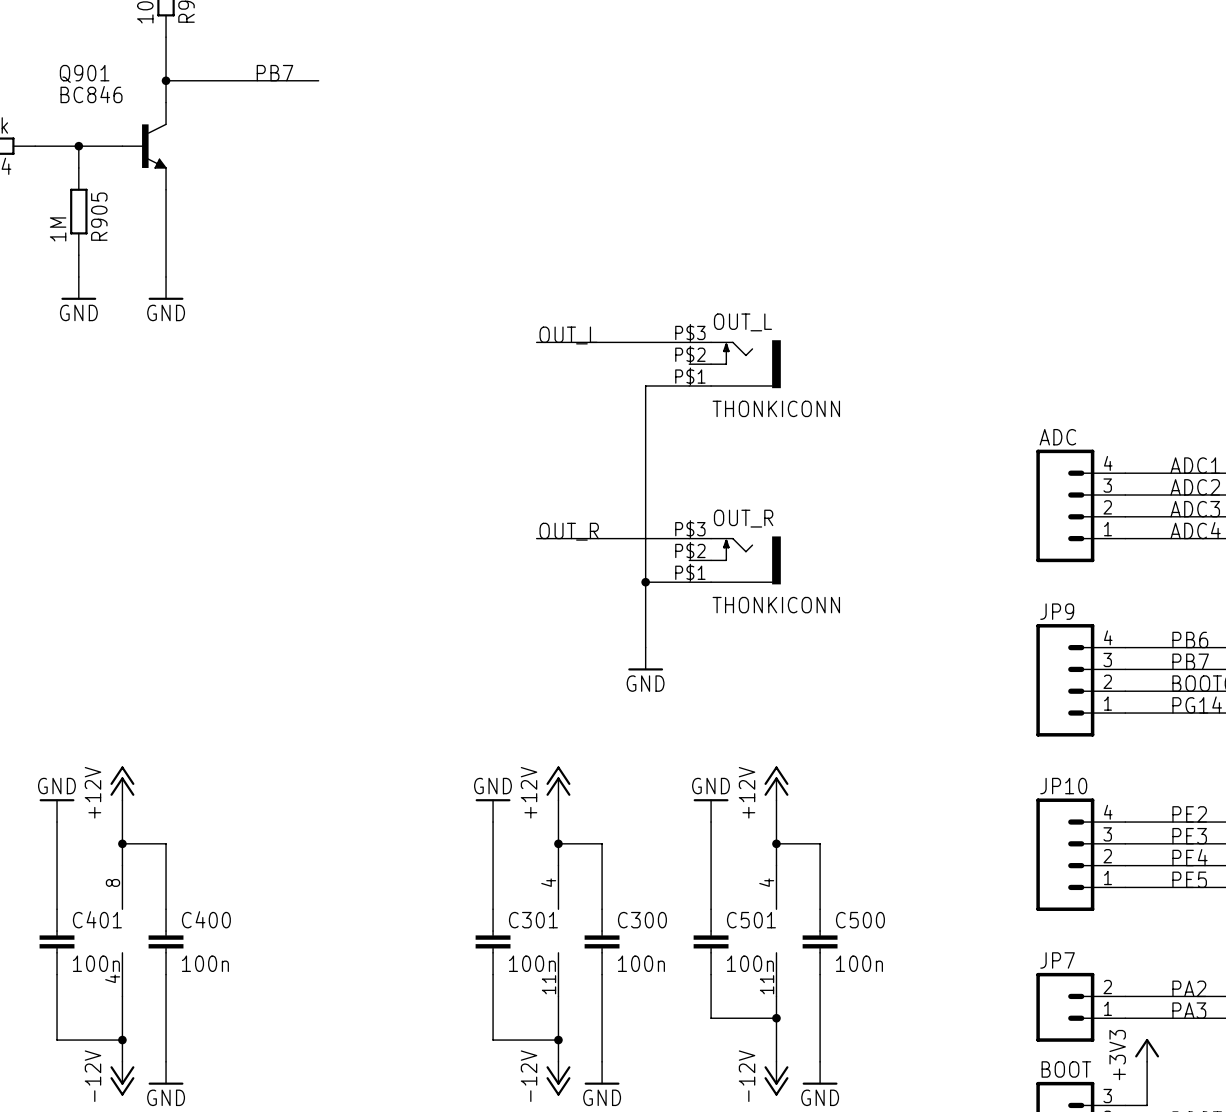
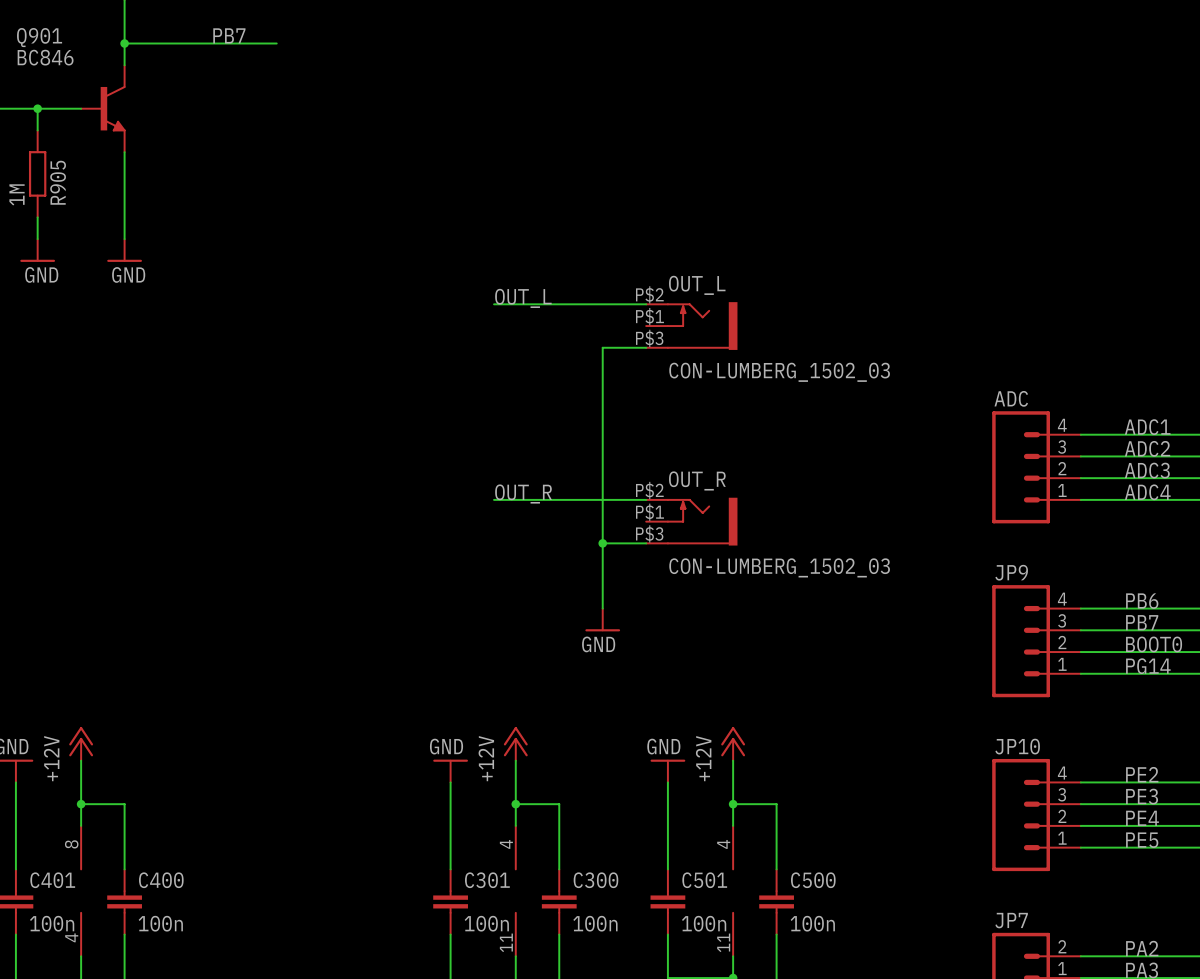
OUT_L pin number: P$3 (690, 332) -> P$2 (649, 294)
OUT_L pin number: P$2 (690, 354) -> P$1 (649, 316)
OUT_L pin number: P$1 (690, 376) -> P$3 (649, 338)
OUT_L value: THONKICONN (776, 408) -> CON-LUMBERG_1502_03 (779, 372)
OUT_R pin number: P$3 (690, 529) -> P$2 (649, 490)
OUT_R pin number: P$2 (690, 550) -> P$1 (649, 512)
OUT_R pin number: P$1 (690, 572) -> P$3 (649, 533)
OUT_R value: THONKICONN (776, 605) -> CON-LUMBERG_1502_03 (779, 567)

